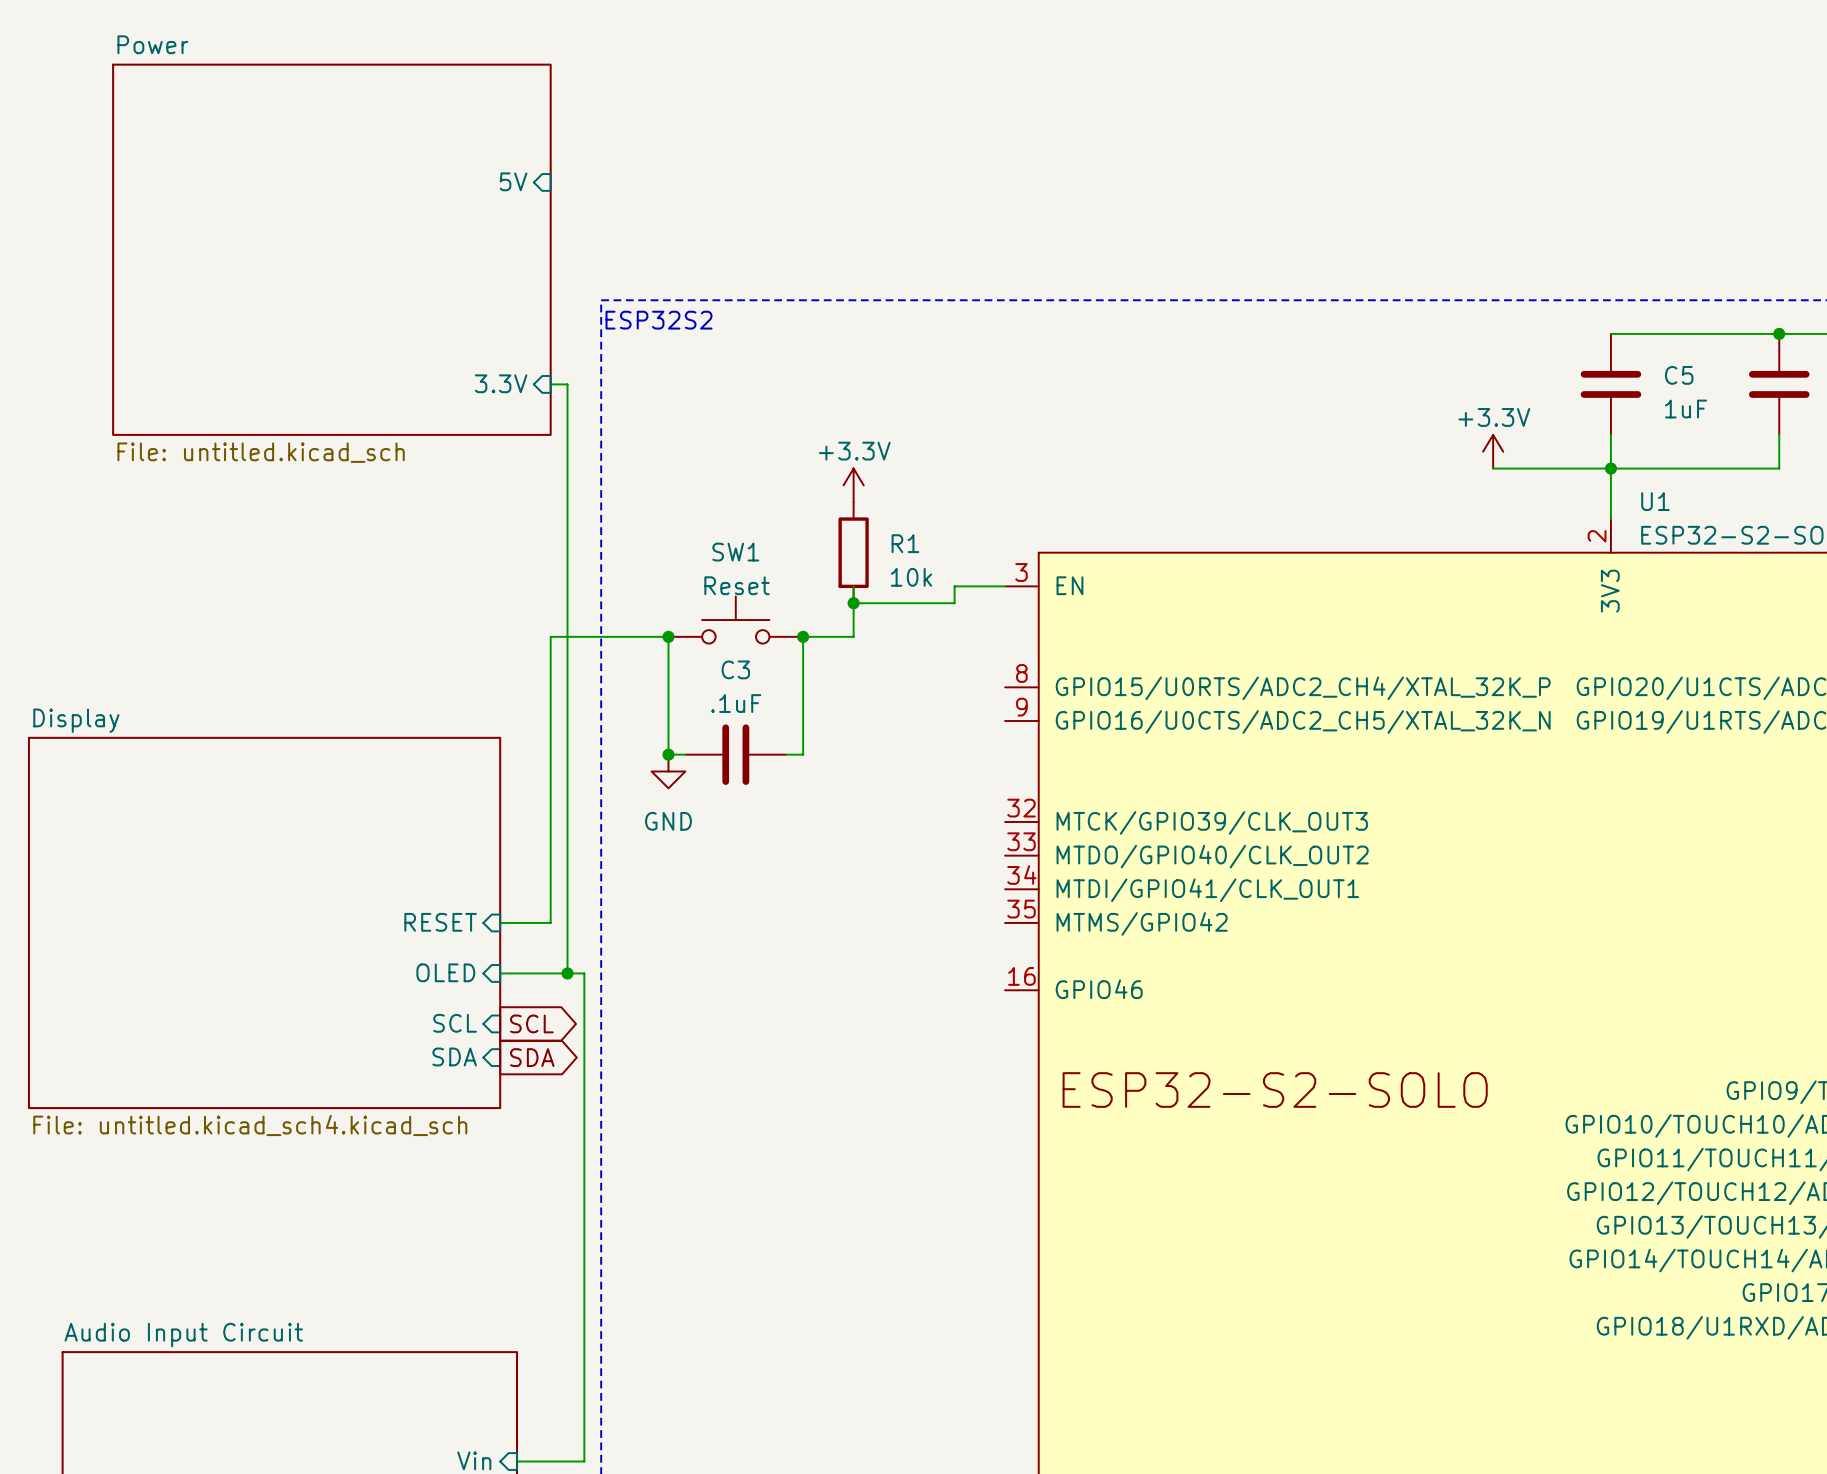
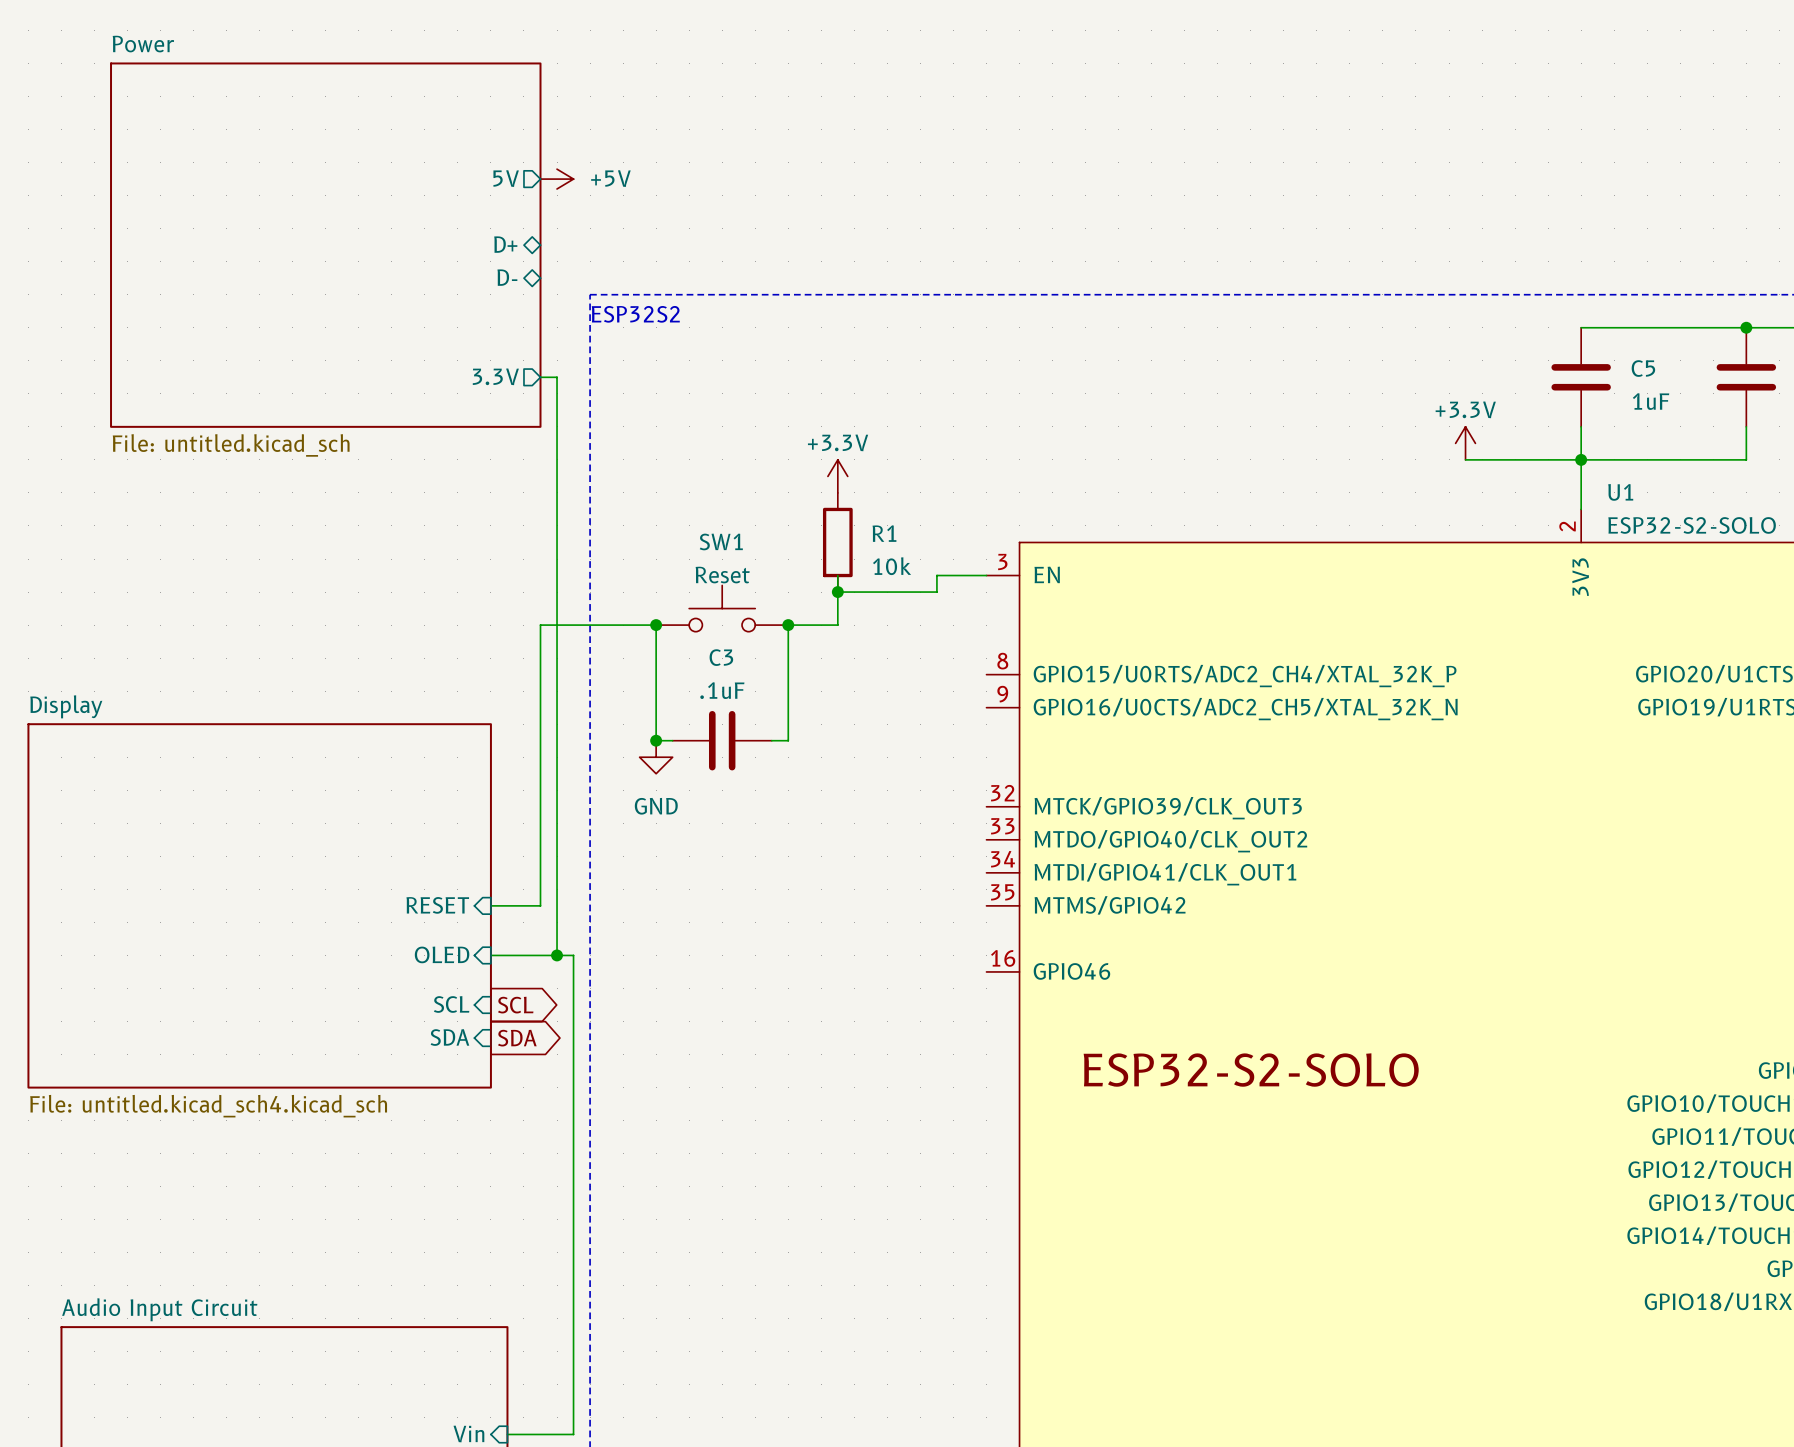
sheet pin shape: input (513, 181) -> output (506, 178)
power symbol: none -> +5V (557, 179)
sheet pin: none -> D+ (505, 244)
sheet pin: none -> D- (507, 277)
sheet pin shape: input (501, 383) -> output (495, 376)

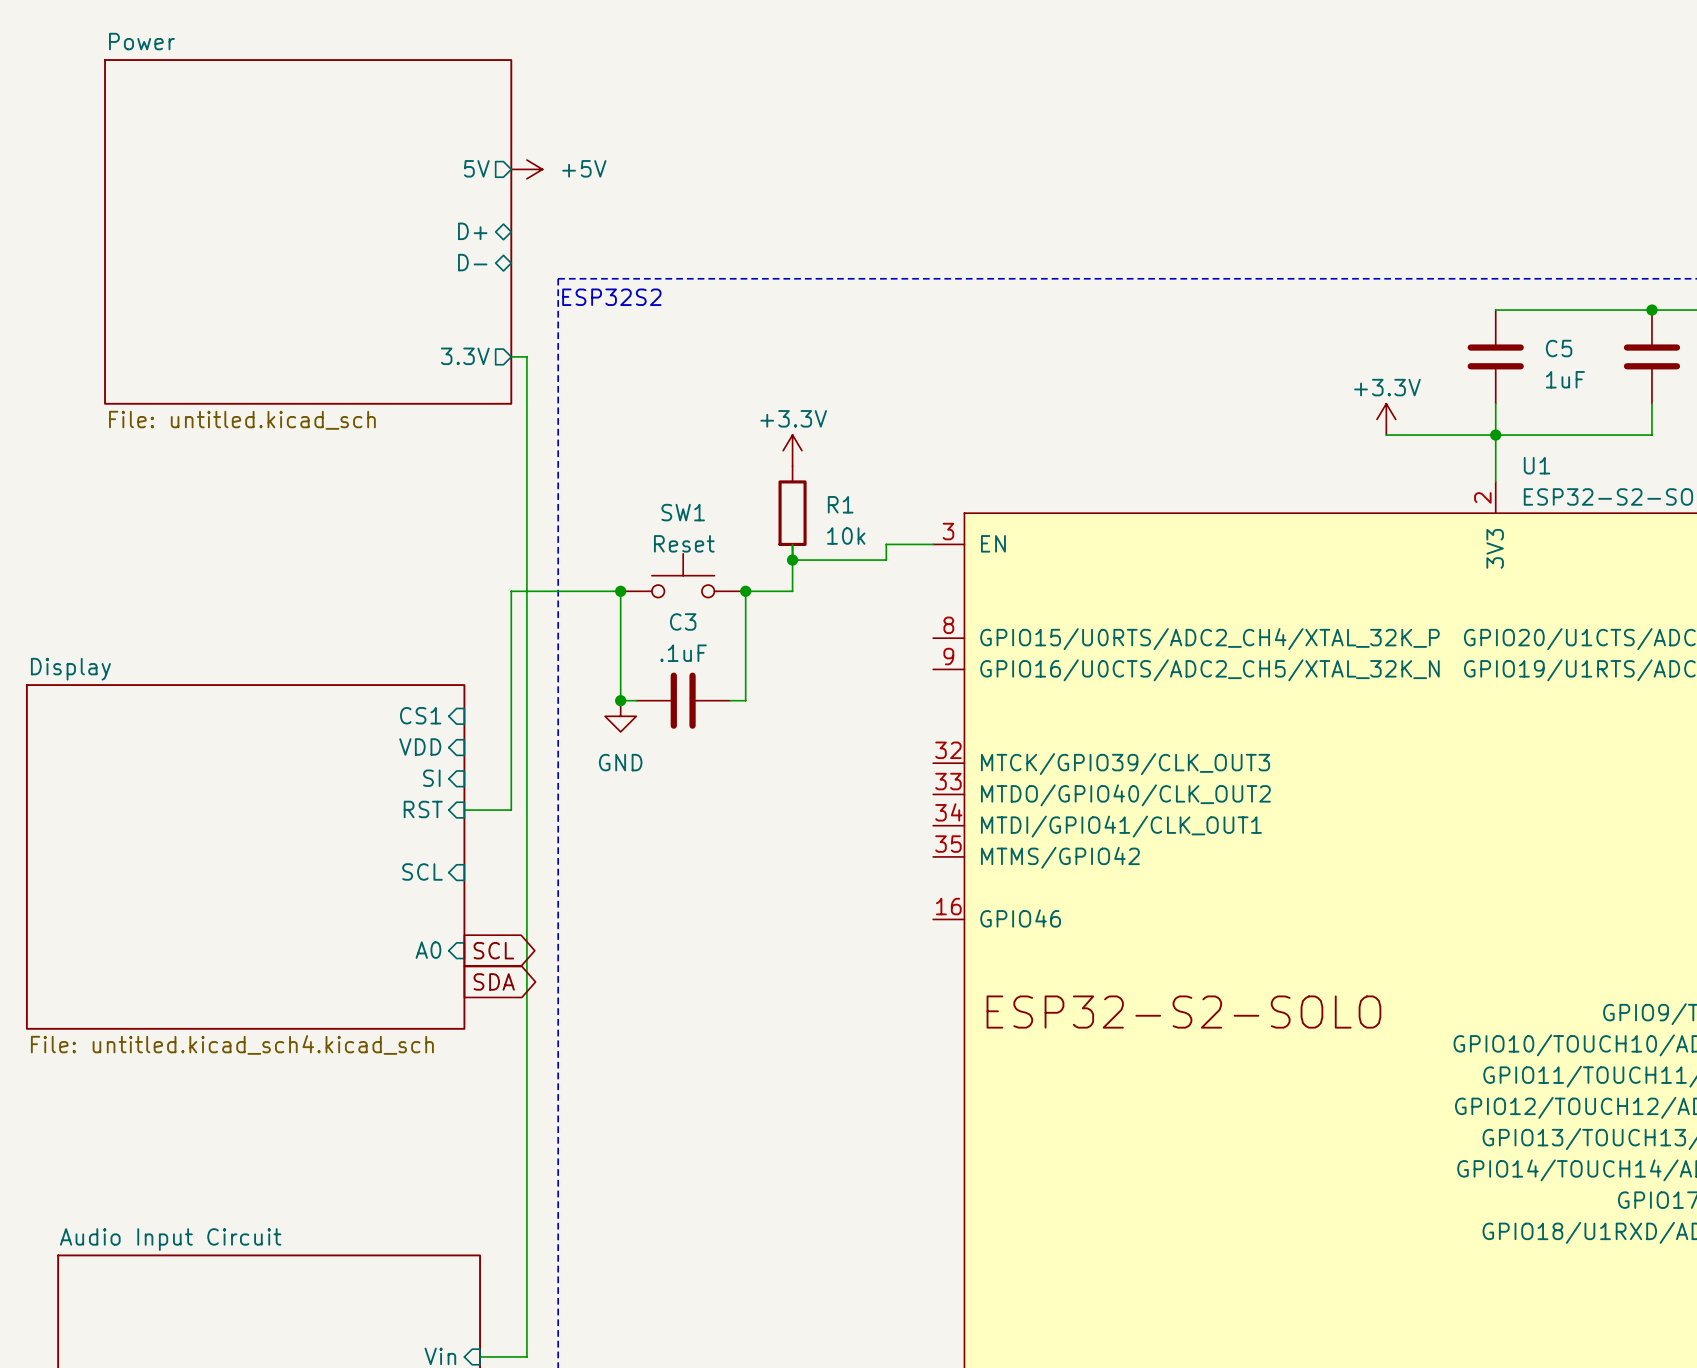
sheet pin: none -> CS1 (420, 715)
sheet pin: none -> VDD (420, 746)
sheet pin: none -> SI (431, 778)
sheet pin: none -> RST (423, 809)
wire: (540, 856) (540, 905) (490, 905) -> (511, 810) (464, 810)
sheet pin: RESET (437, 905) -> none
sheet pin: none -> SCL (422, 871)
sheet pin: OLED (442, 954) -> none
wire: (490, 955) (573, 955) (573, 1434) (557, 1434) -> (526, 903) (526, 1356)
junction: (557, 955) -> none
sheet pin: SCL (451, 1004) -> A0 (428, 950)
sheet pin: SDA (449, 1037) -> none

